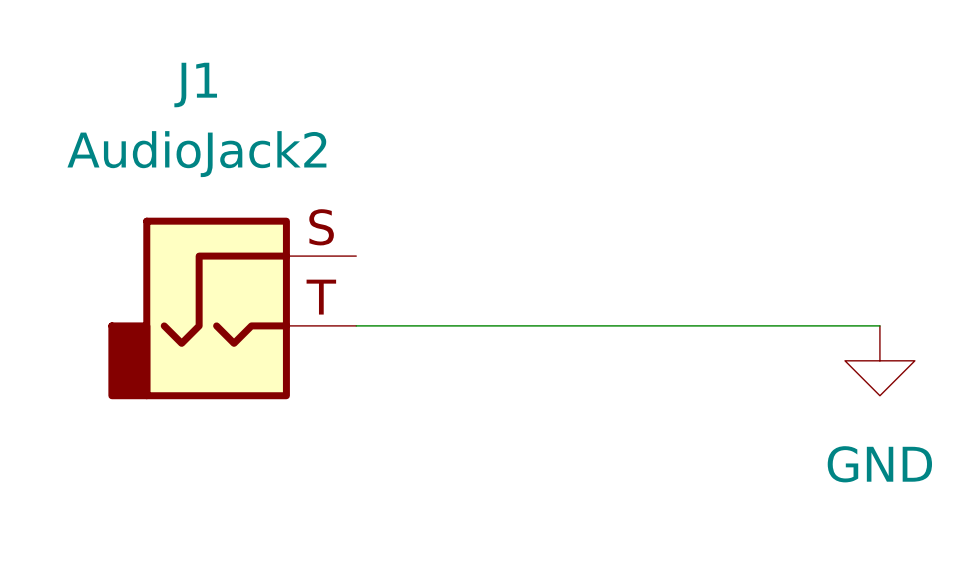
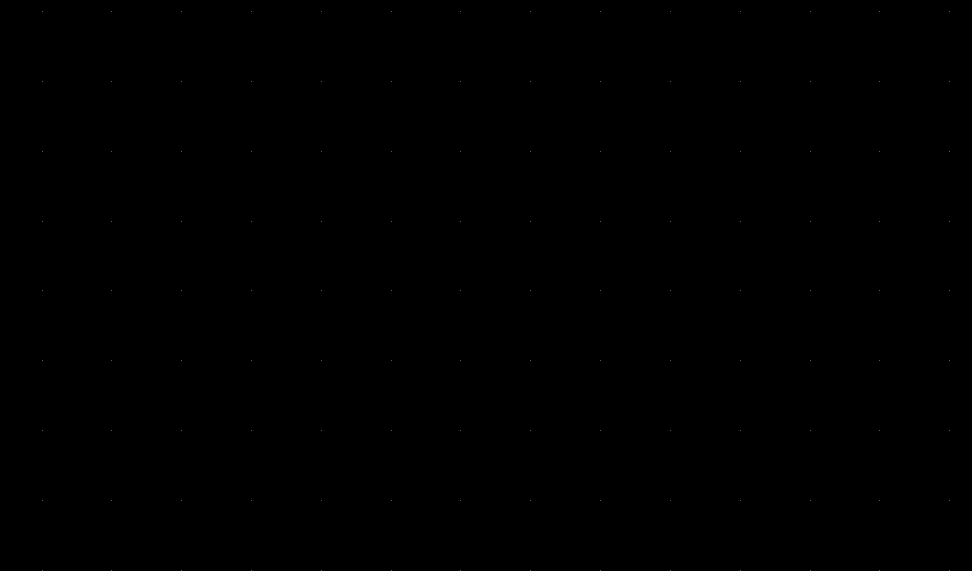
J1: AudioJack2 (232, 308) -> none
wire: (356, 325) (879, 325) -> none
power symbol: GND (879, 360) -> none

